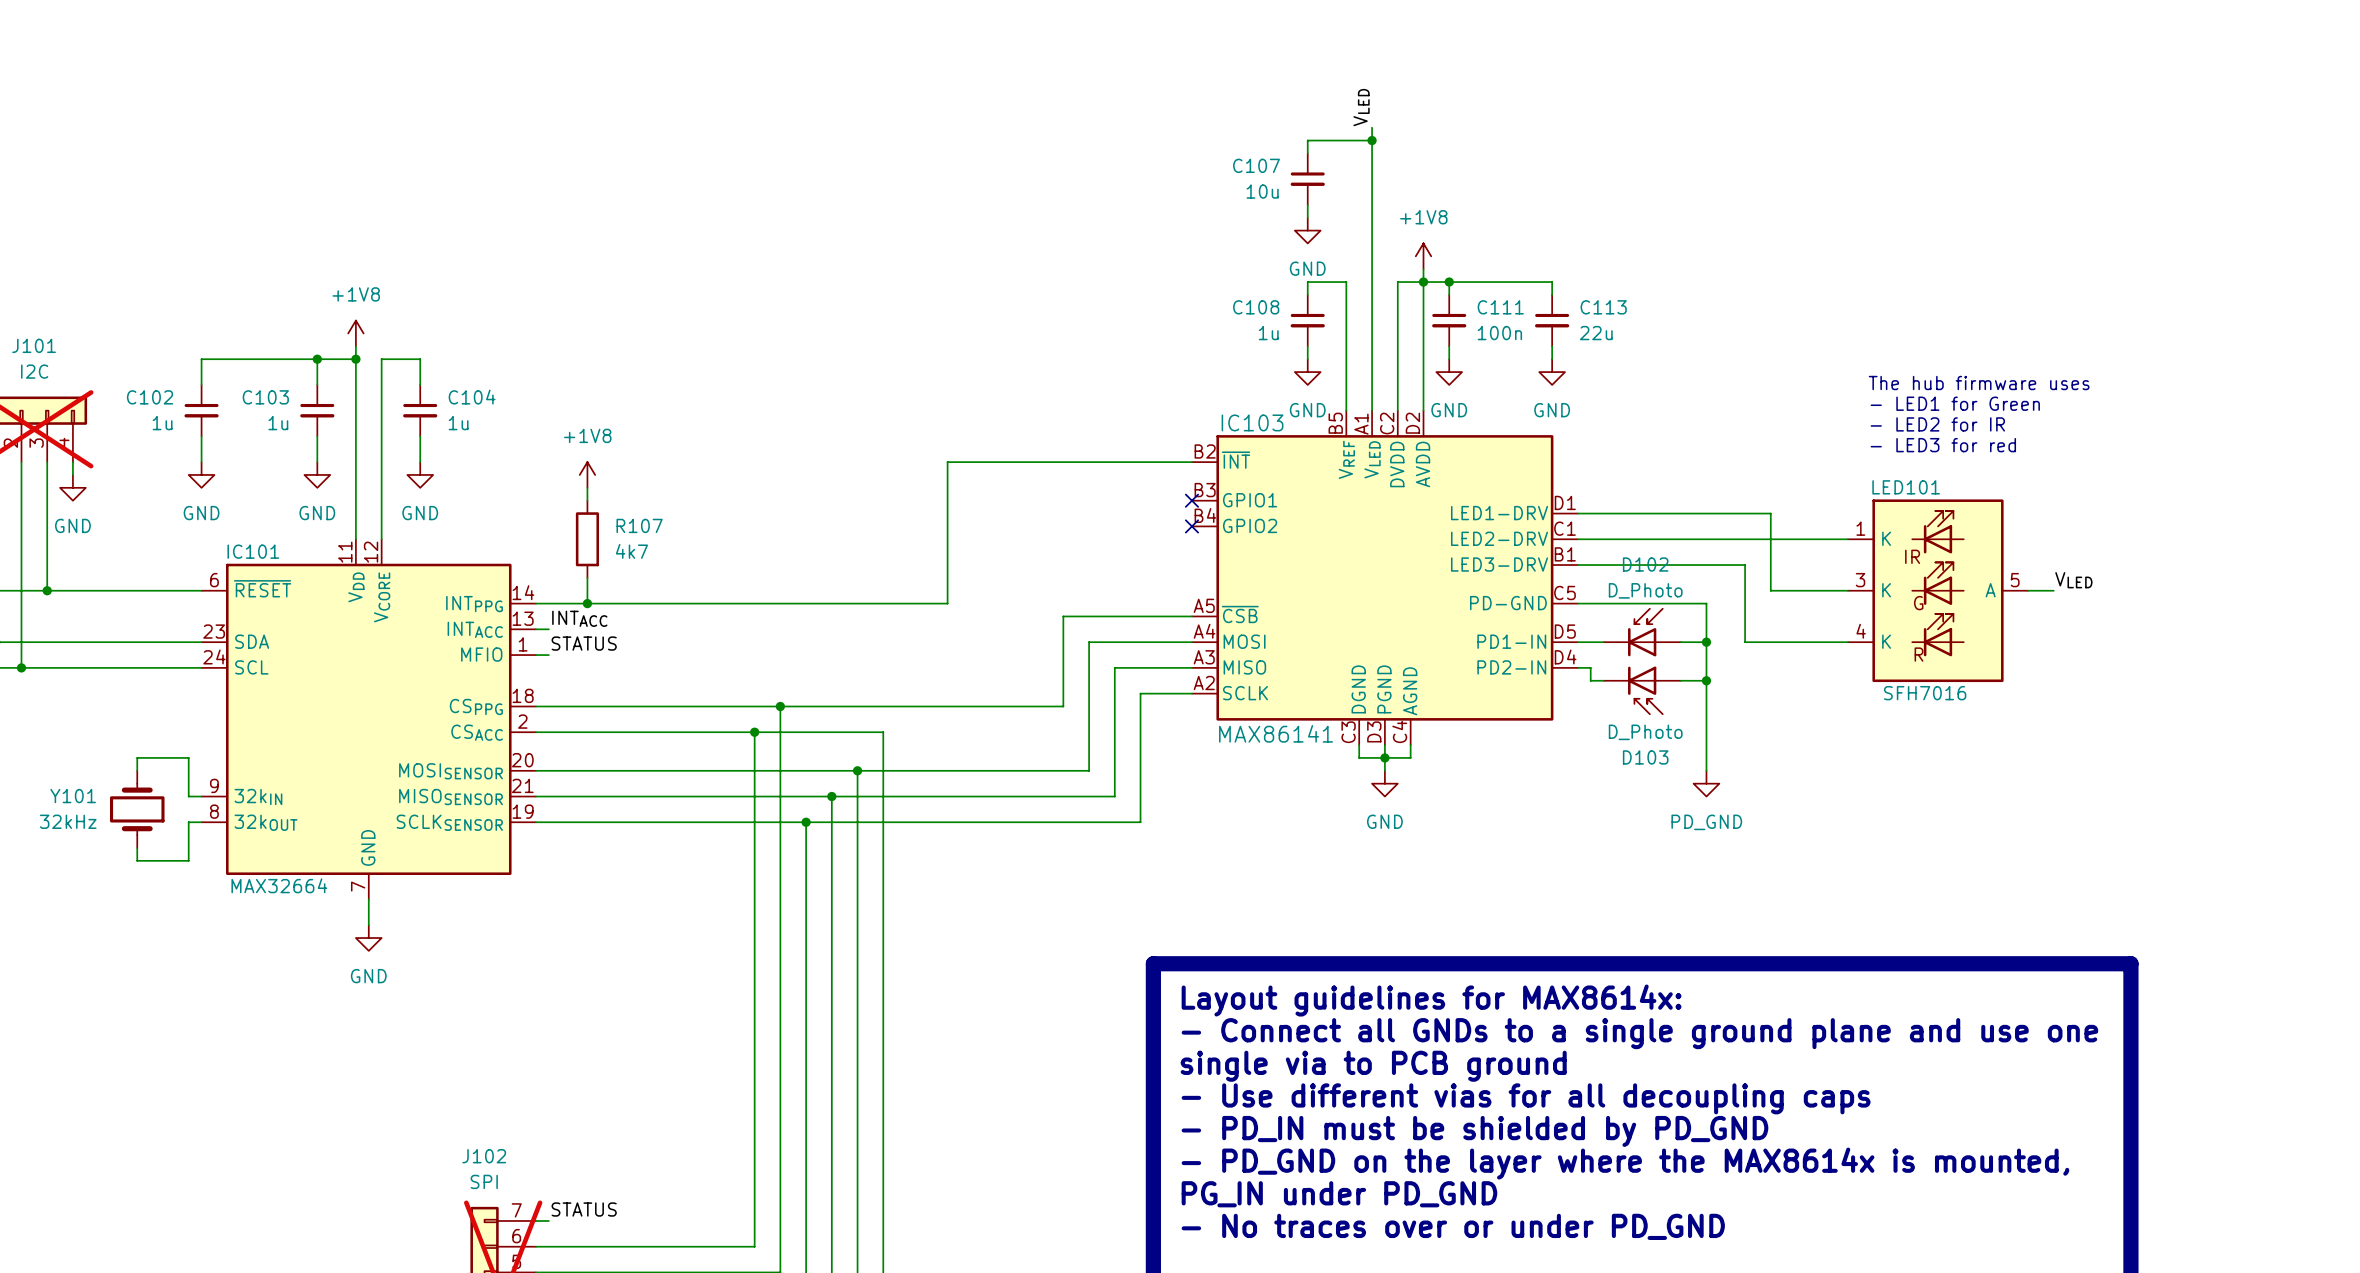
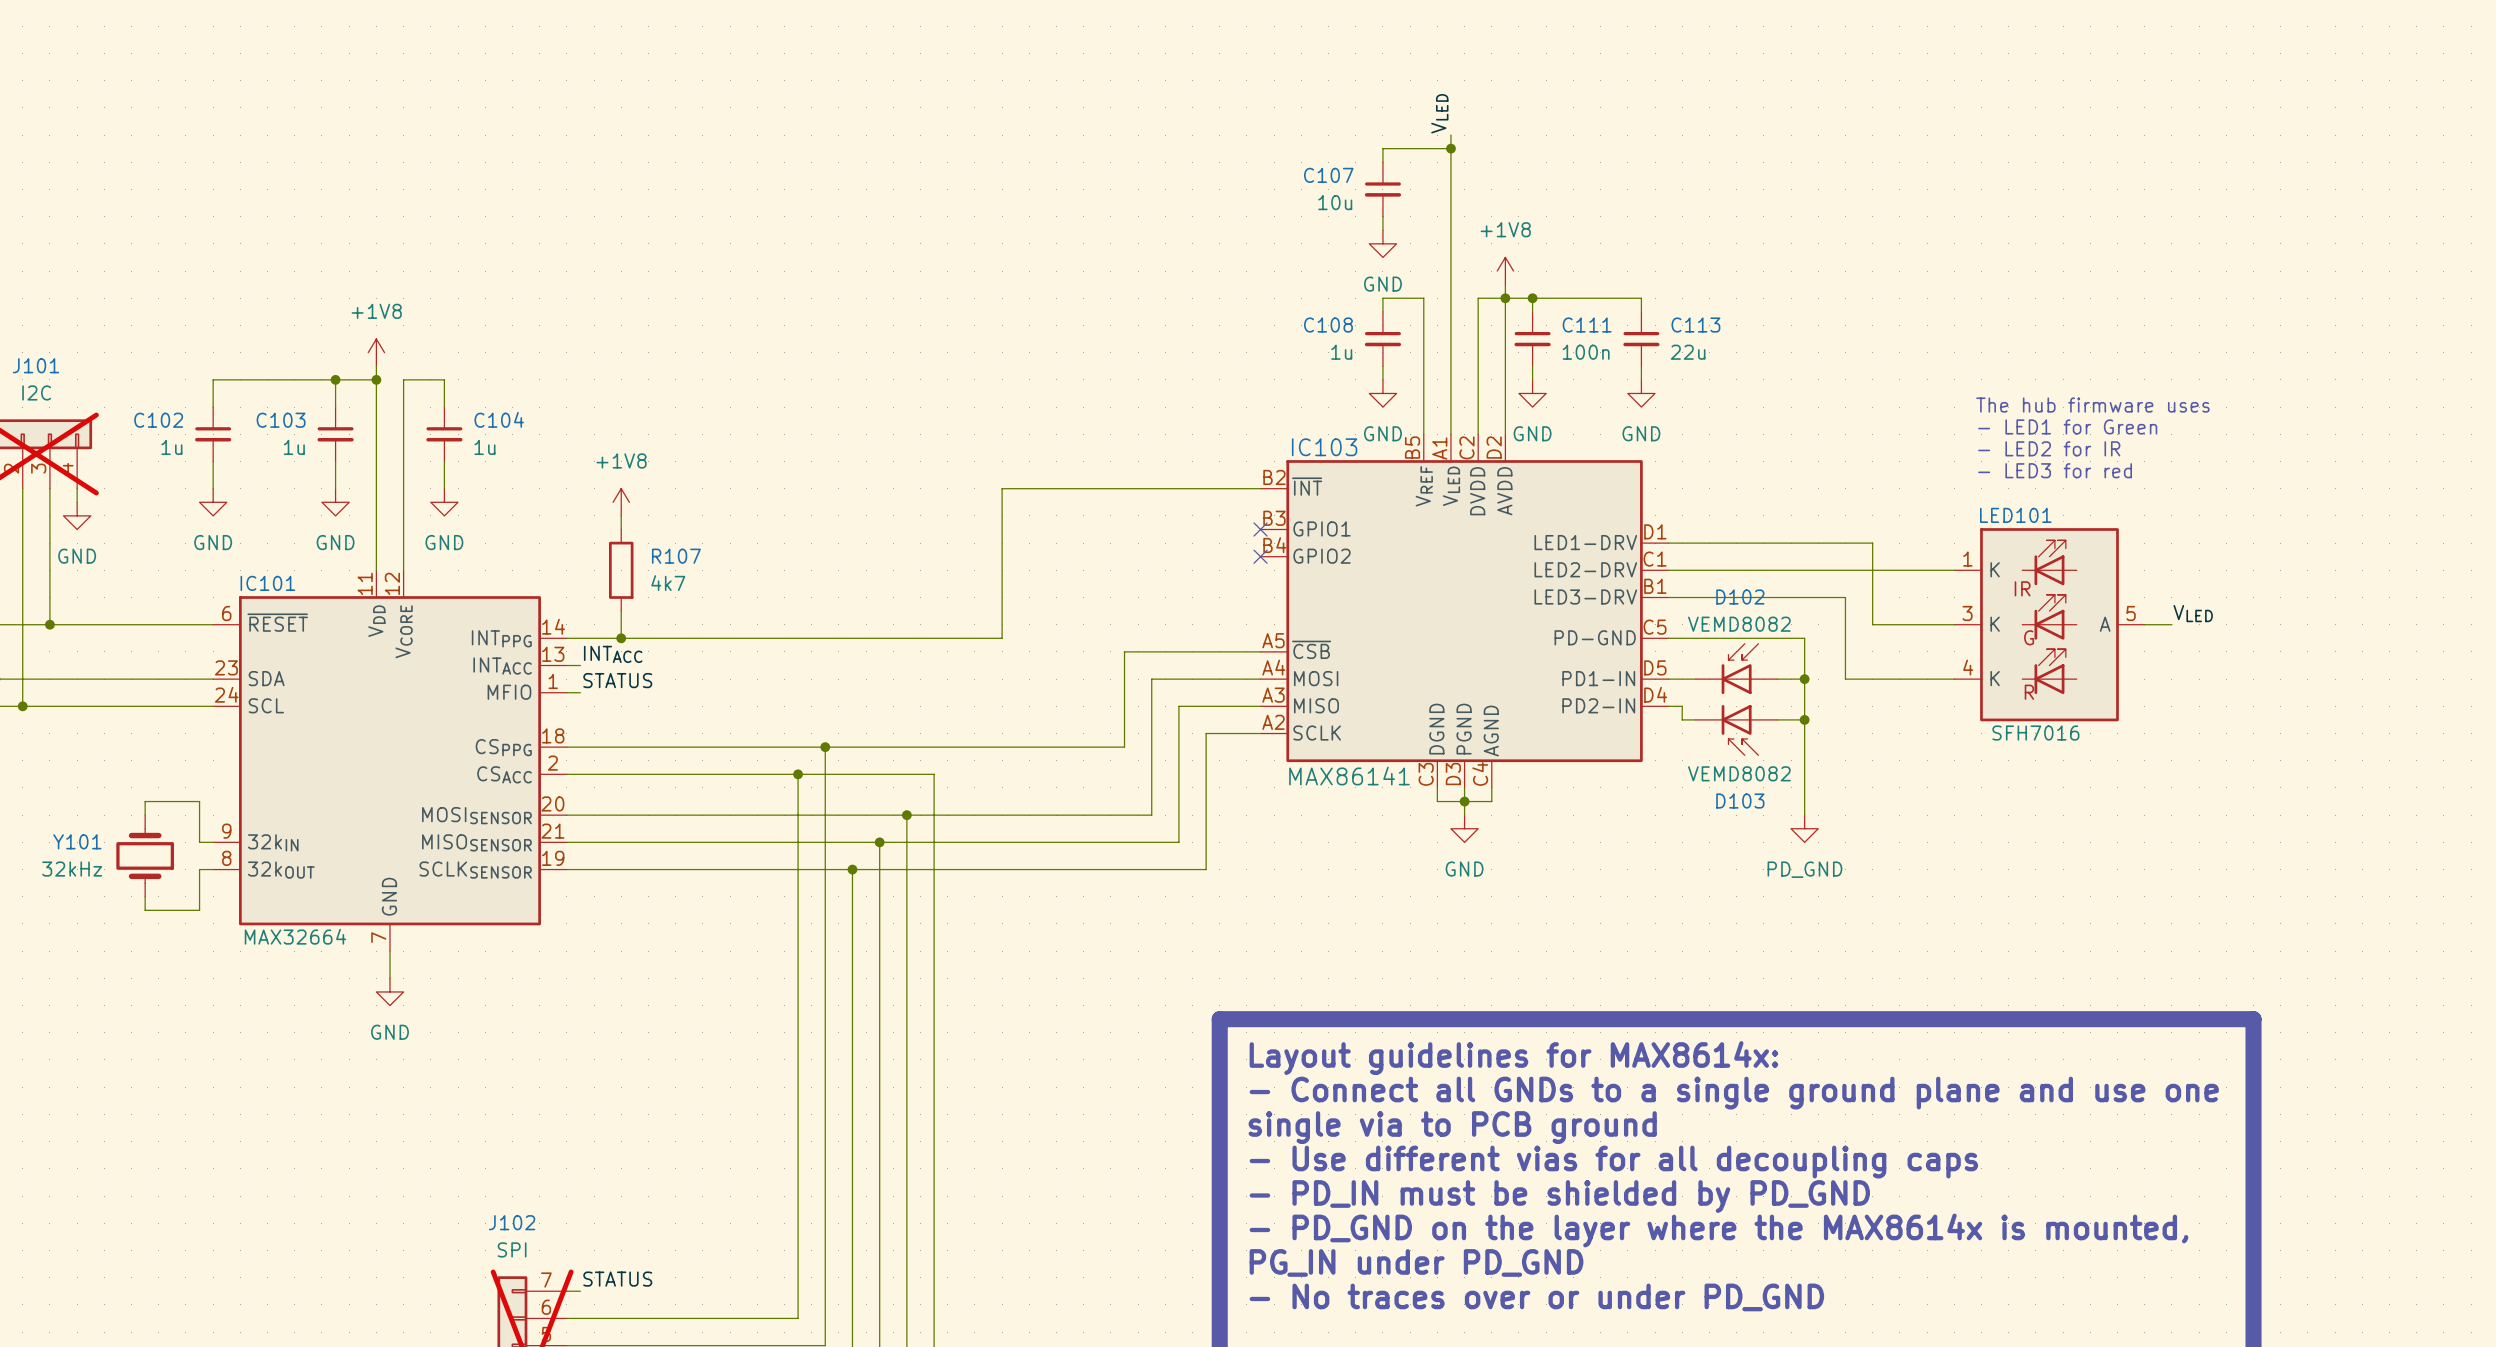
D102 value: D_Photo (1645, 590) -> VEMD8082 (1739, 624)
D103 value: D_Photo (1645, 732) -> VEMD8082 (1739, 773)

